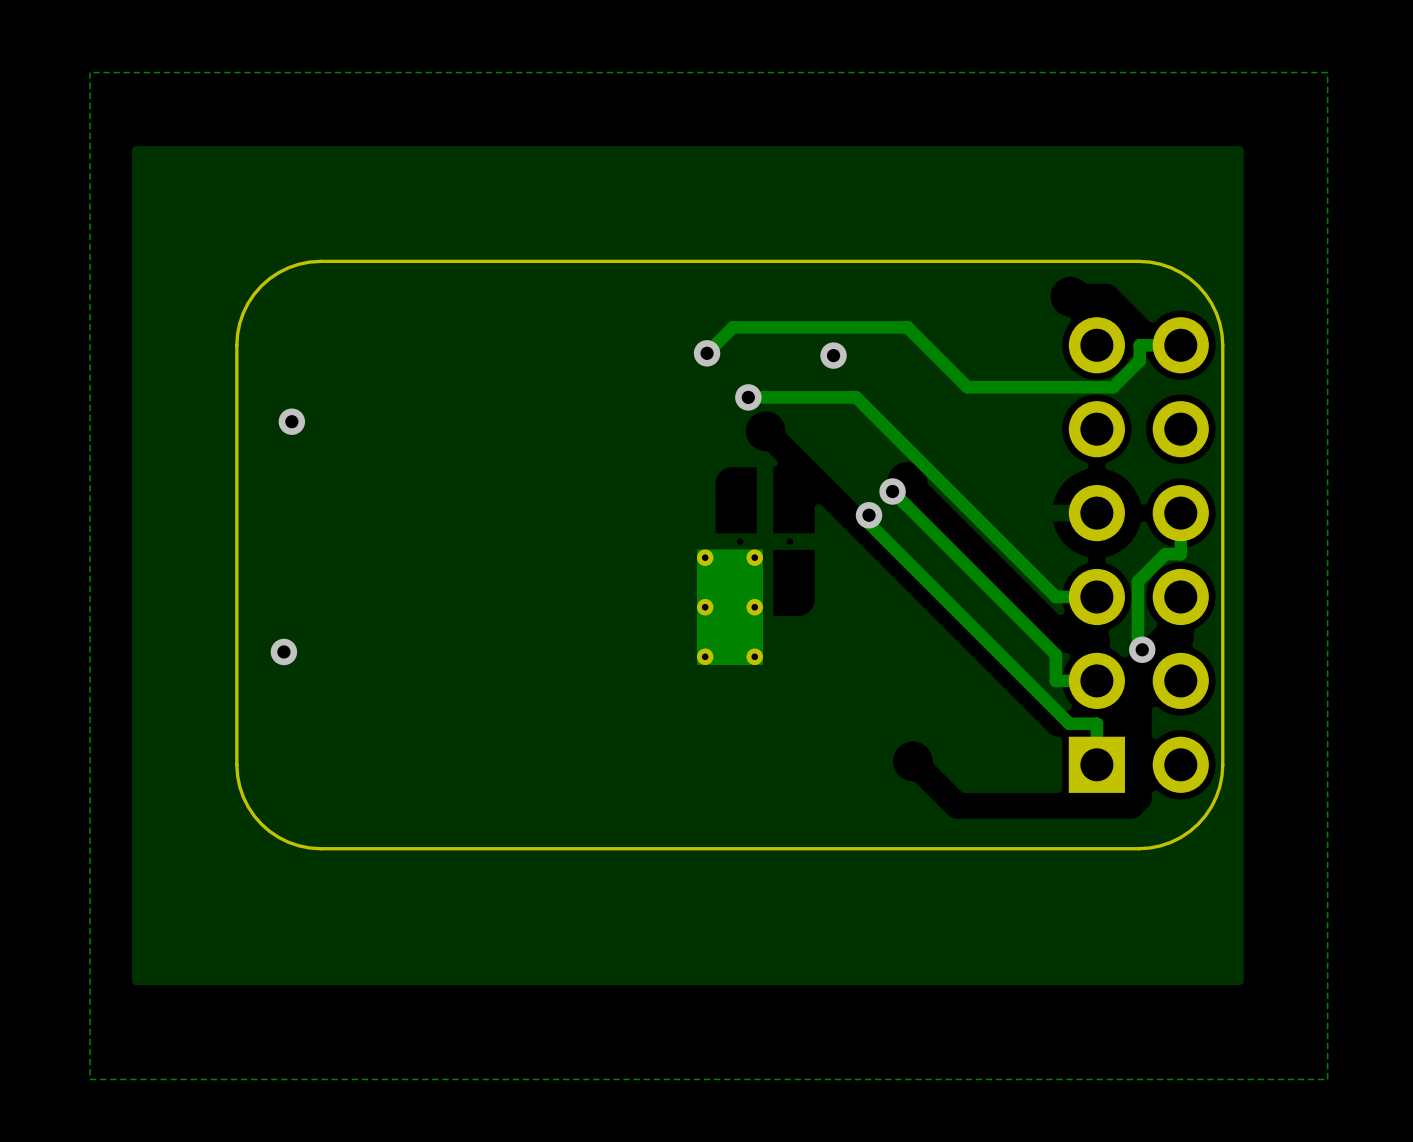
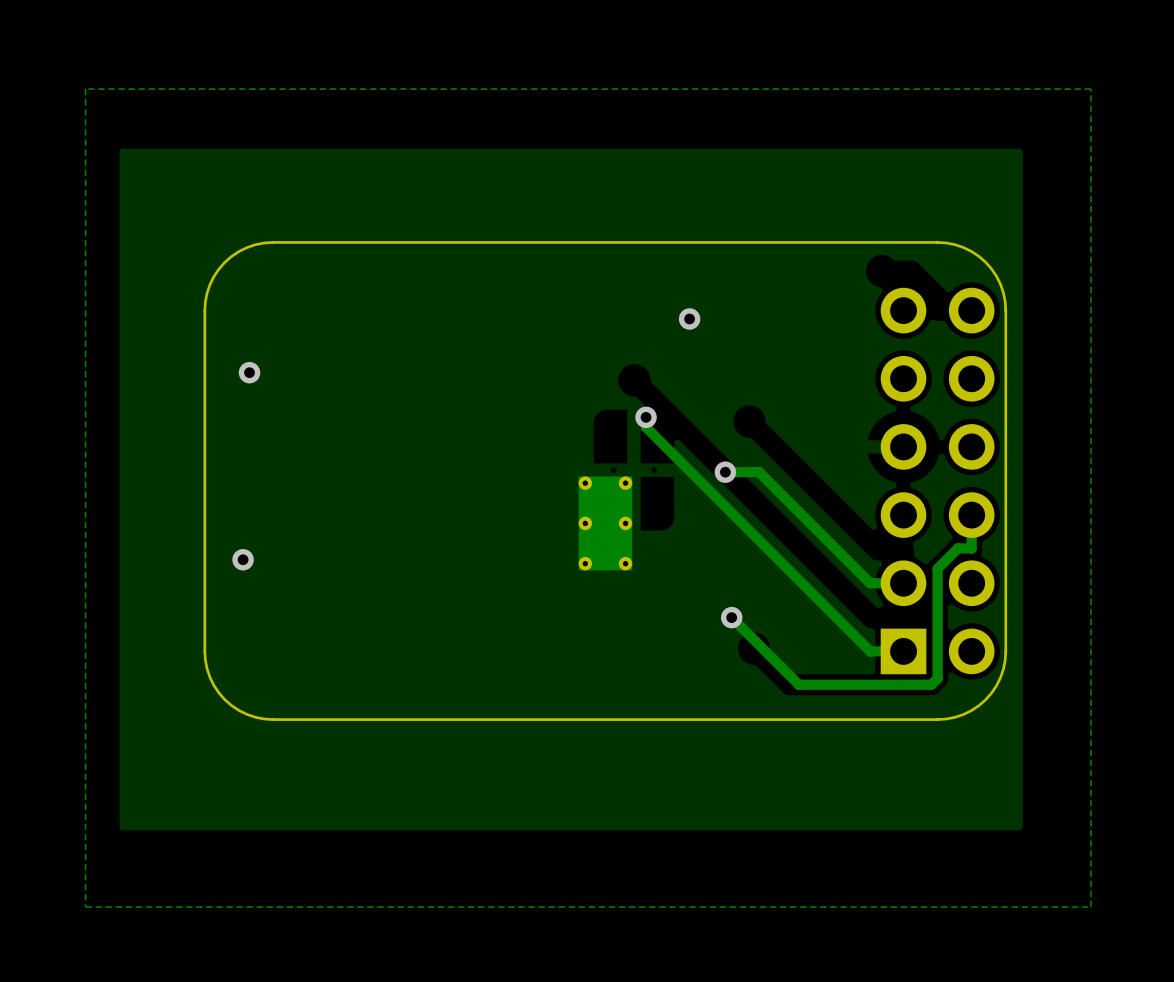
track: (1180, 345) (1139, 345) (1139, 360) (1113, 387) (967, 387) (907, 327) (732, 327) (707, 353) -> none
via: (707, 353) -> none
track: (748, 397) (856, 397) (1055, 596) (1096, 596) -> none
via: (748, 397) -> none
via: none -> (646, 417)
track: (892, 491) (1055, 654) (1055, 680) -> (725, 472) (759, 472) (870, 583)
via: (892, 491) -> none
track: (1180, 513) (1180, 554) (1165, 554) (1137, 581) (1137, 645) (1142, 649) -> none
track: (869, 515) (869, 523) (1069, 723) (1096, 723) (1096, 764) -> (646, 417) (646, 427) (870, 651) (903, 651)
via: (869, 515) -> none
via: none -> (725, 472)
track: none -> (971, 515) (971, 548) (957, 548) (937, 568) (937, 678) (931, 684) (798, 684) (731, 617)
via: (1142, 649) -> none
via: none -> (731, 617)

